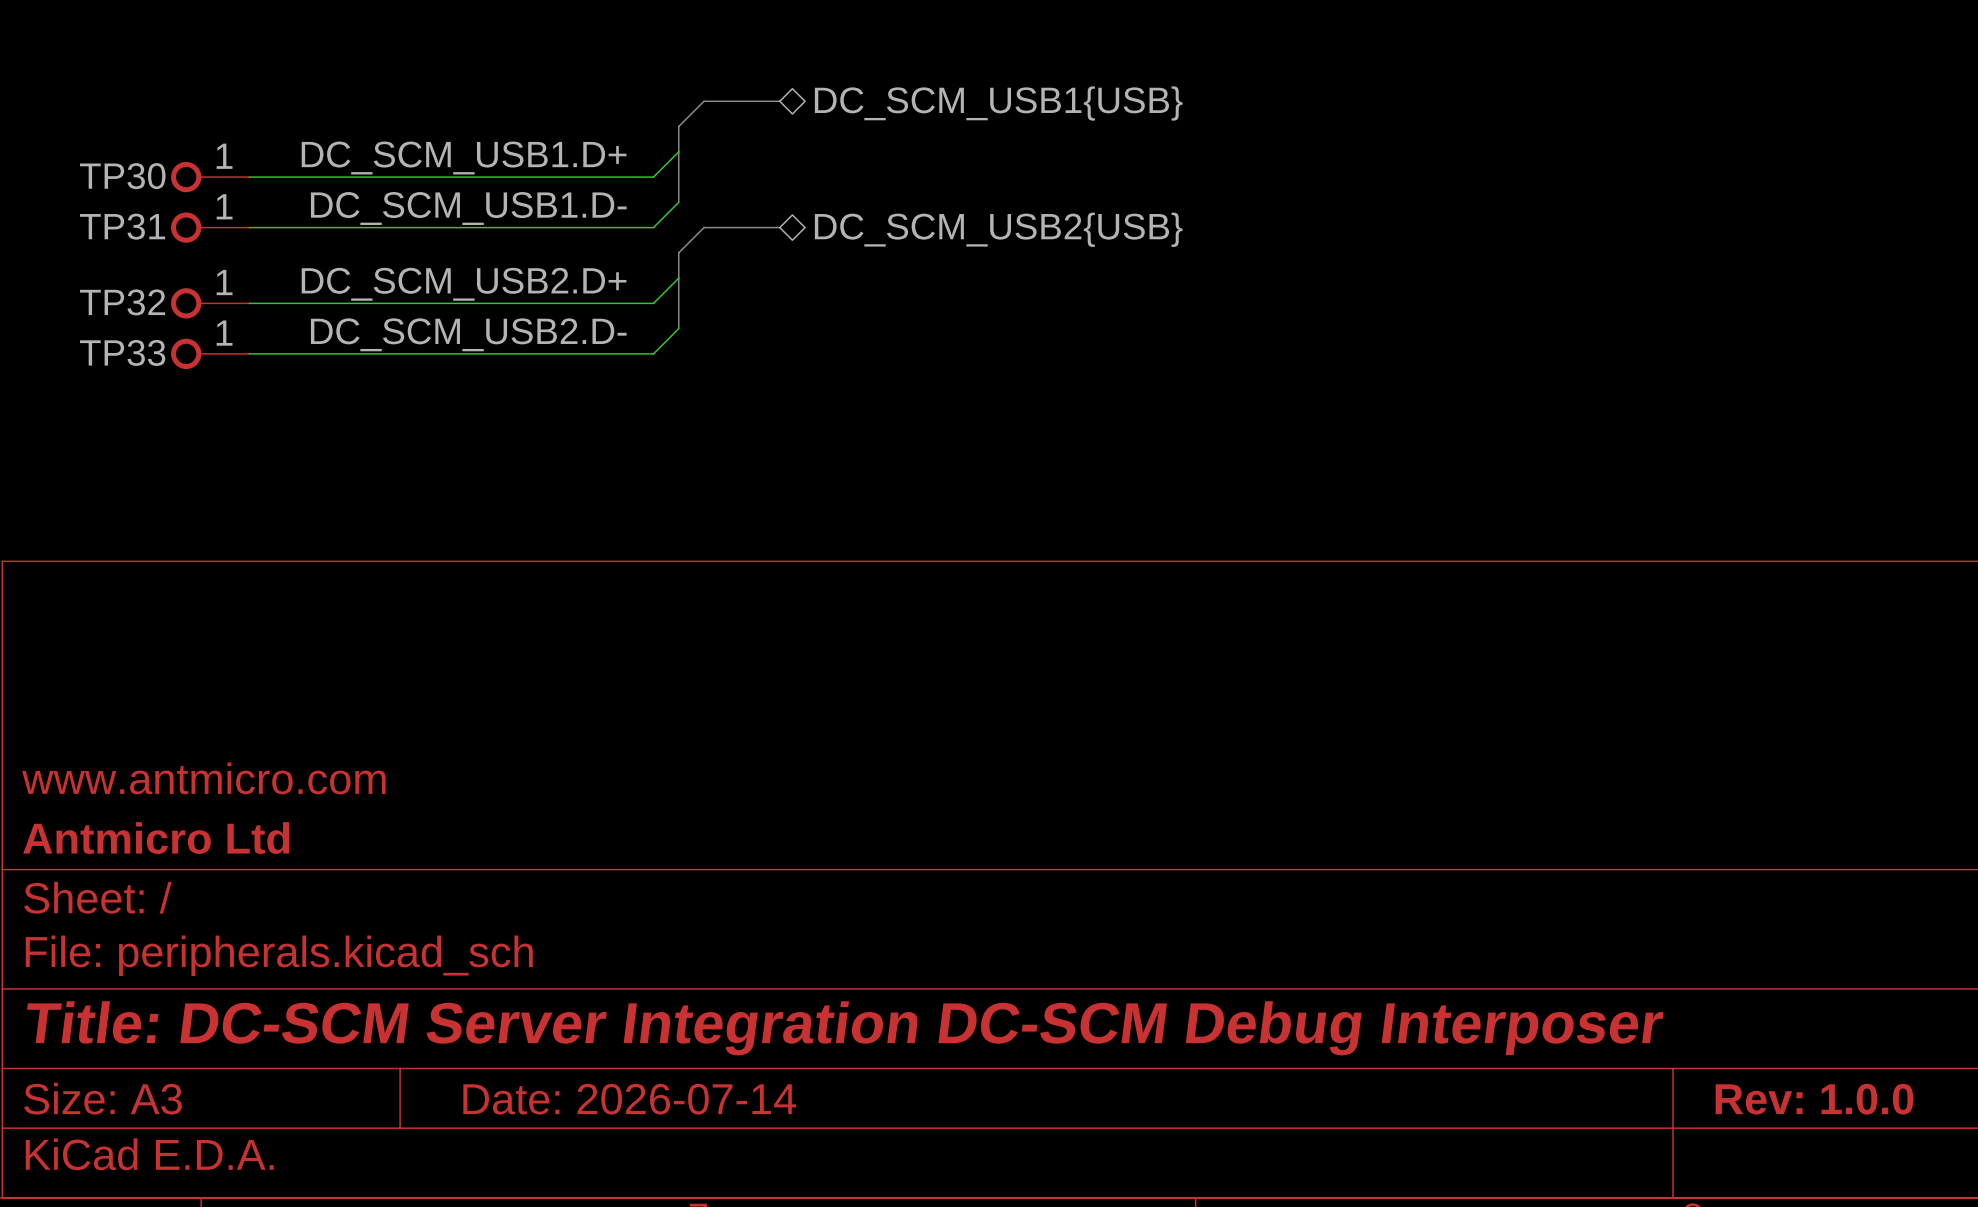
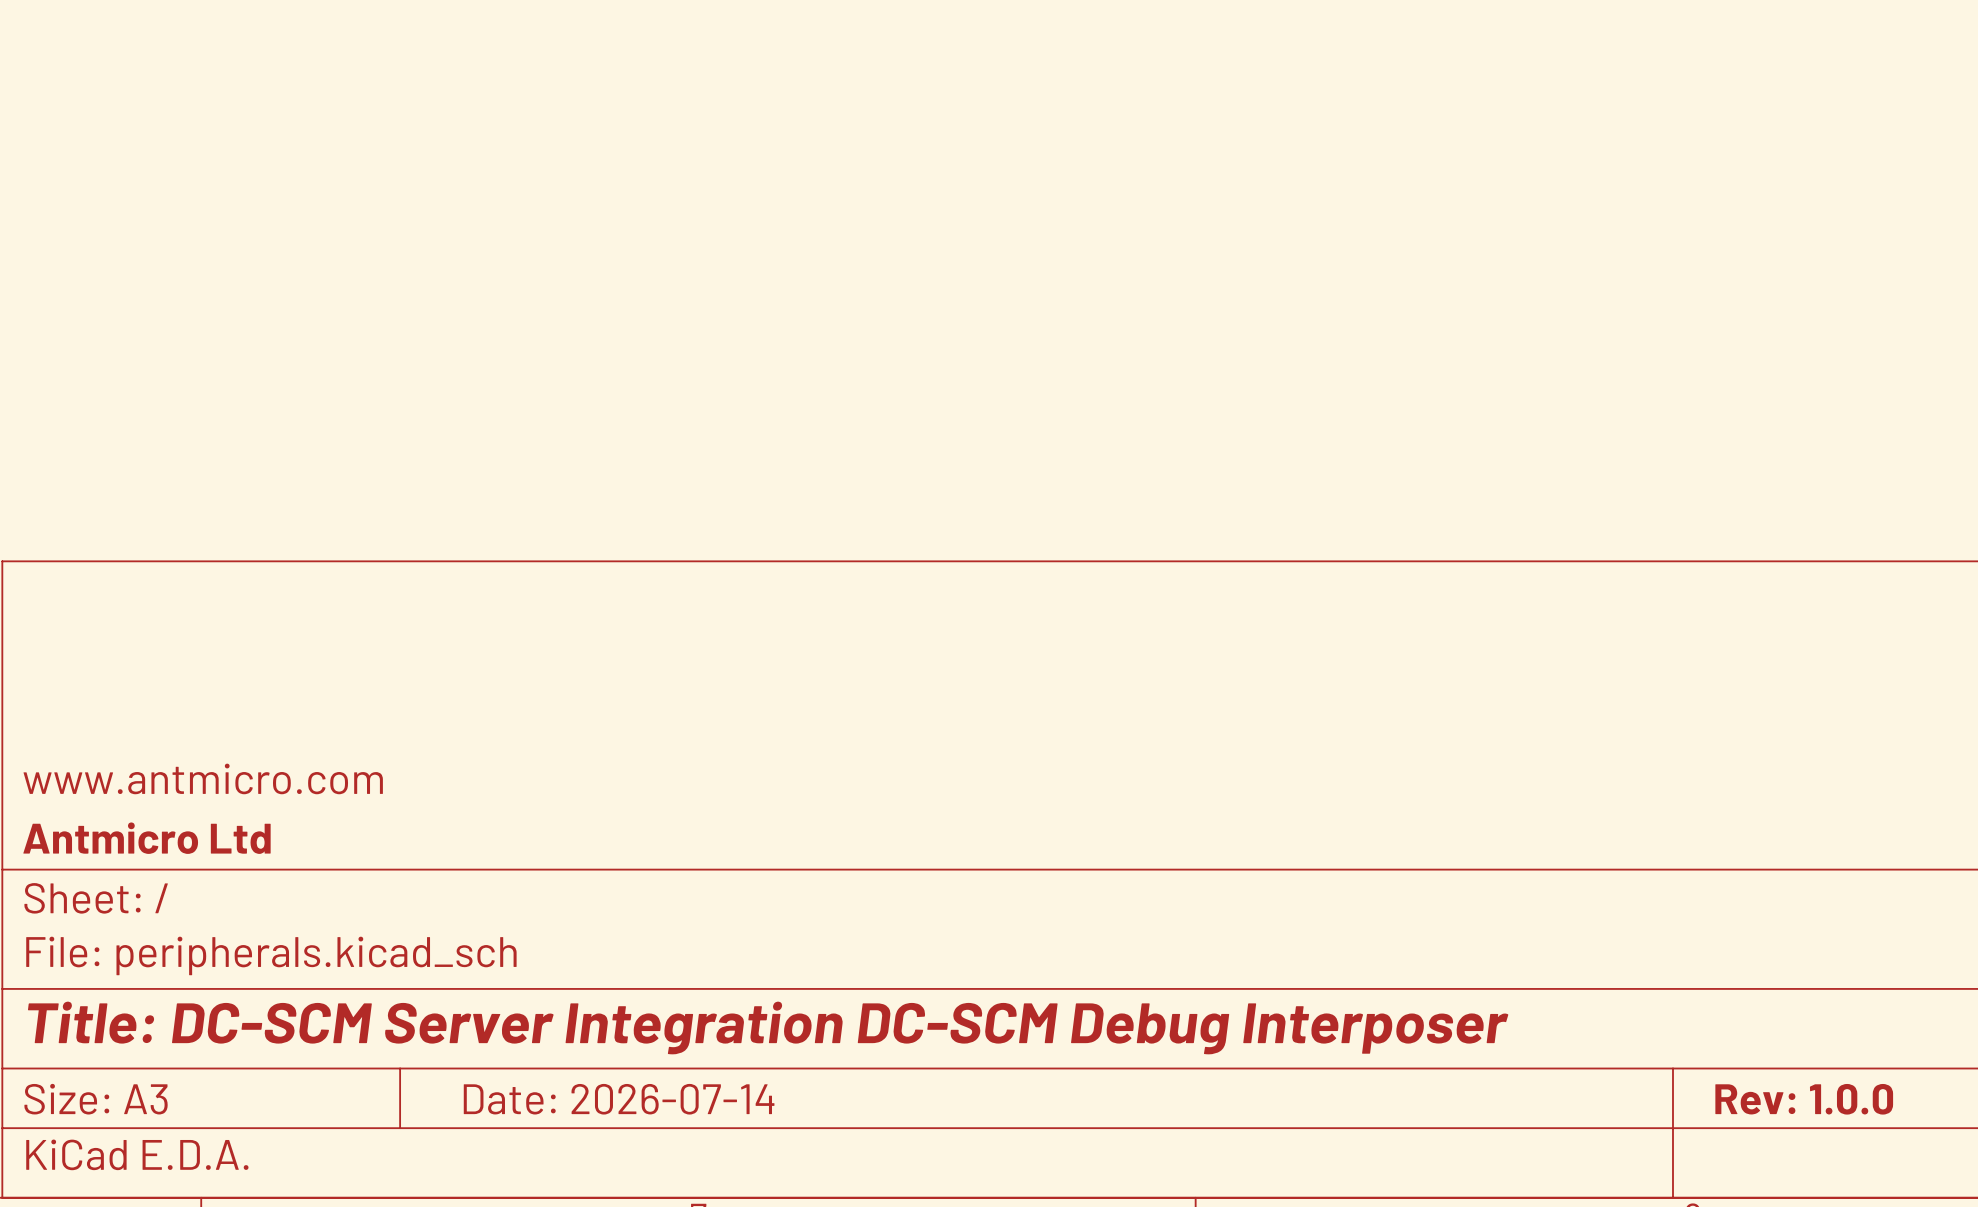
bus: (779, 101) (704, 101) (678, 126) (678, 202) -> none
hierarchical label: DC_SCM_USB1{USB} (998, 103) -> none
wire: (678, 151) (653, 177) (249, 177) -> none
label: DC_SCM_USB1.D+ (464, 158) -> none
TP30: (210, 177) -> none
wire: (678, 202) (653, 227) (249, 227) -> none
label: DC_SCM_USB1.D- (468, 208) -> none
TP31: (210, 227) -> none
bus: (779, 227) (704, 227) (678, 252) (678, 328) -> none
hierarchical label: DC_SCM_USB2{USB} (998, 229) -> none
wire: (678, 278) (653, 303) (249, 303) -> none
label: DC_SCM_USB2.D+ (464, 284) -> none
TP32: (210, 303) -> none
wire: (678, 328) (653, 353) (249, 353) -> none
label: DC_SCM_USB2.D- (468, 334) -> none
TP33: (210, 353) -> none

